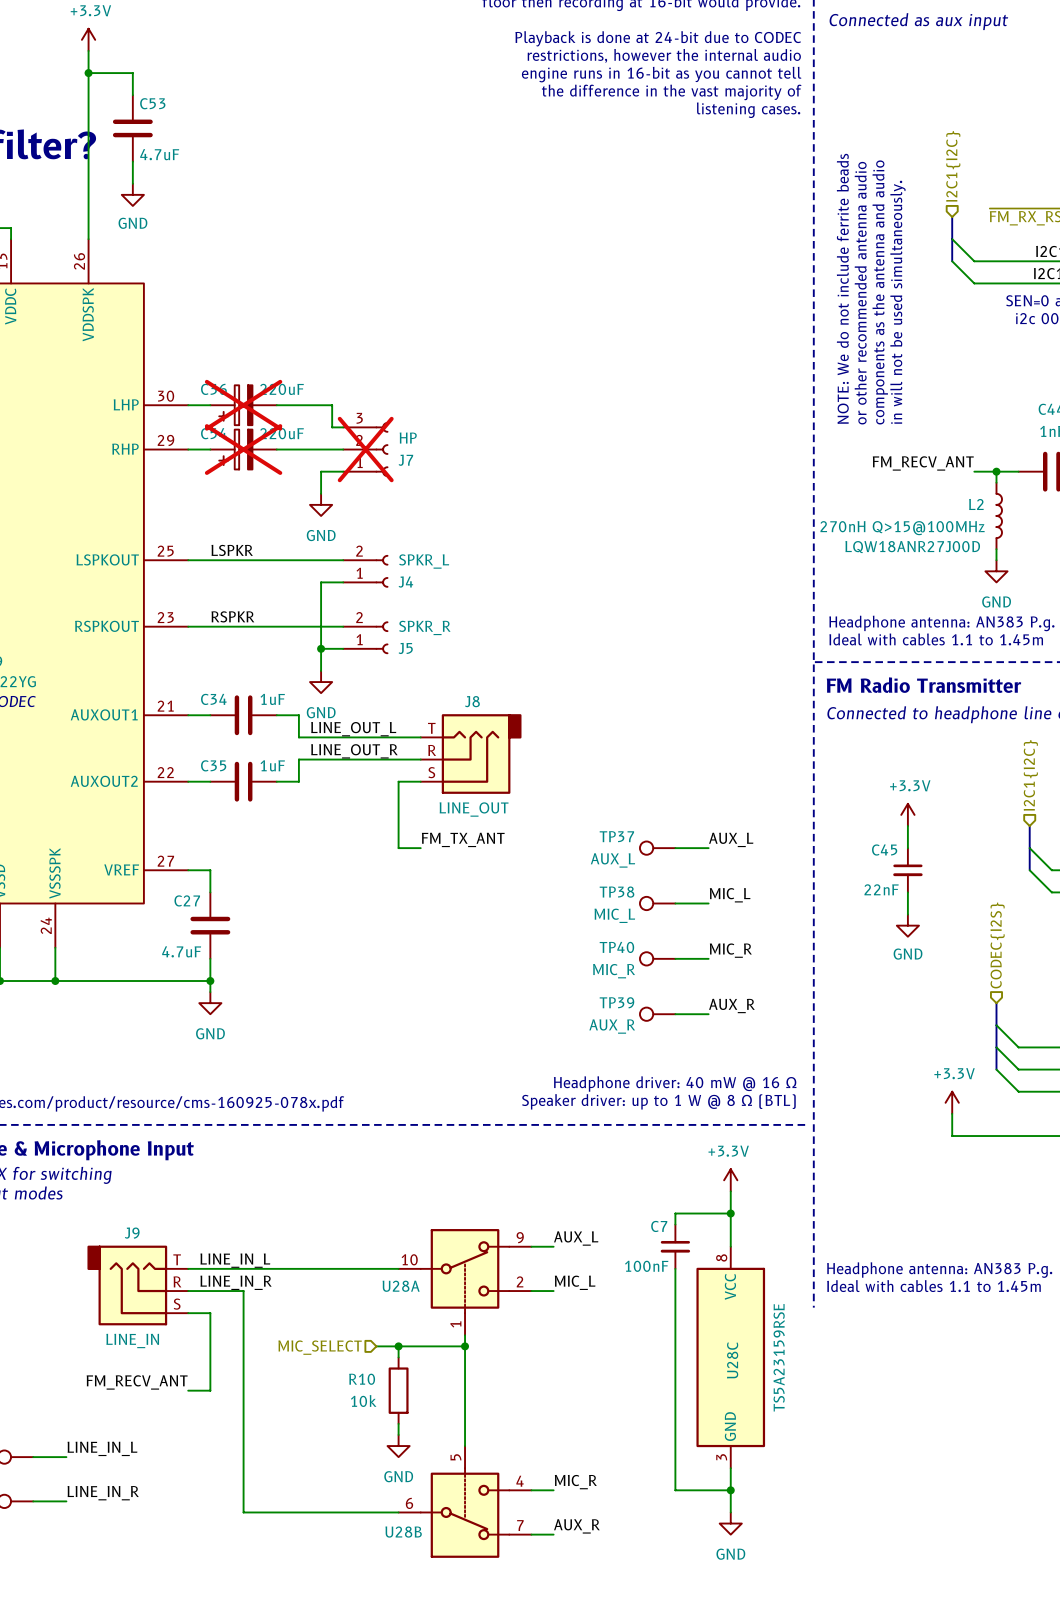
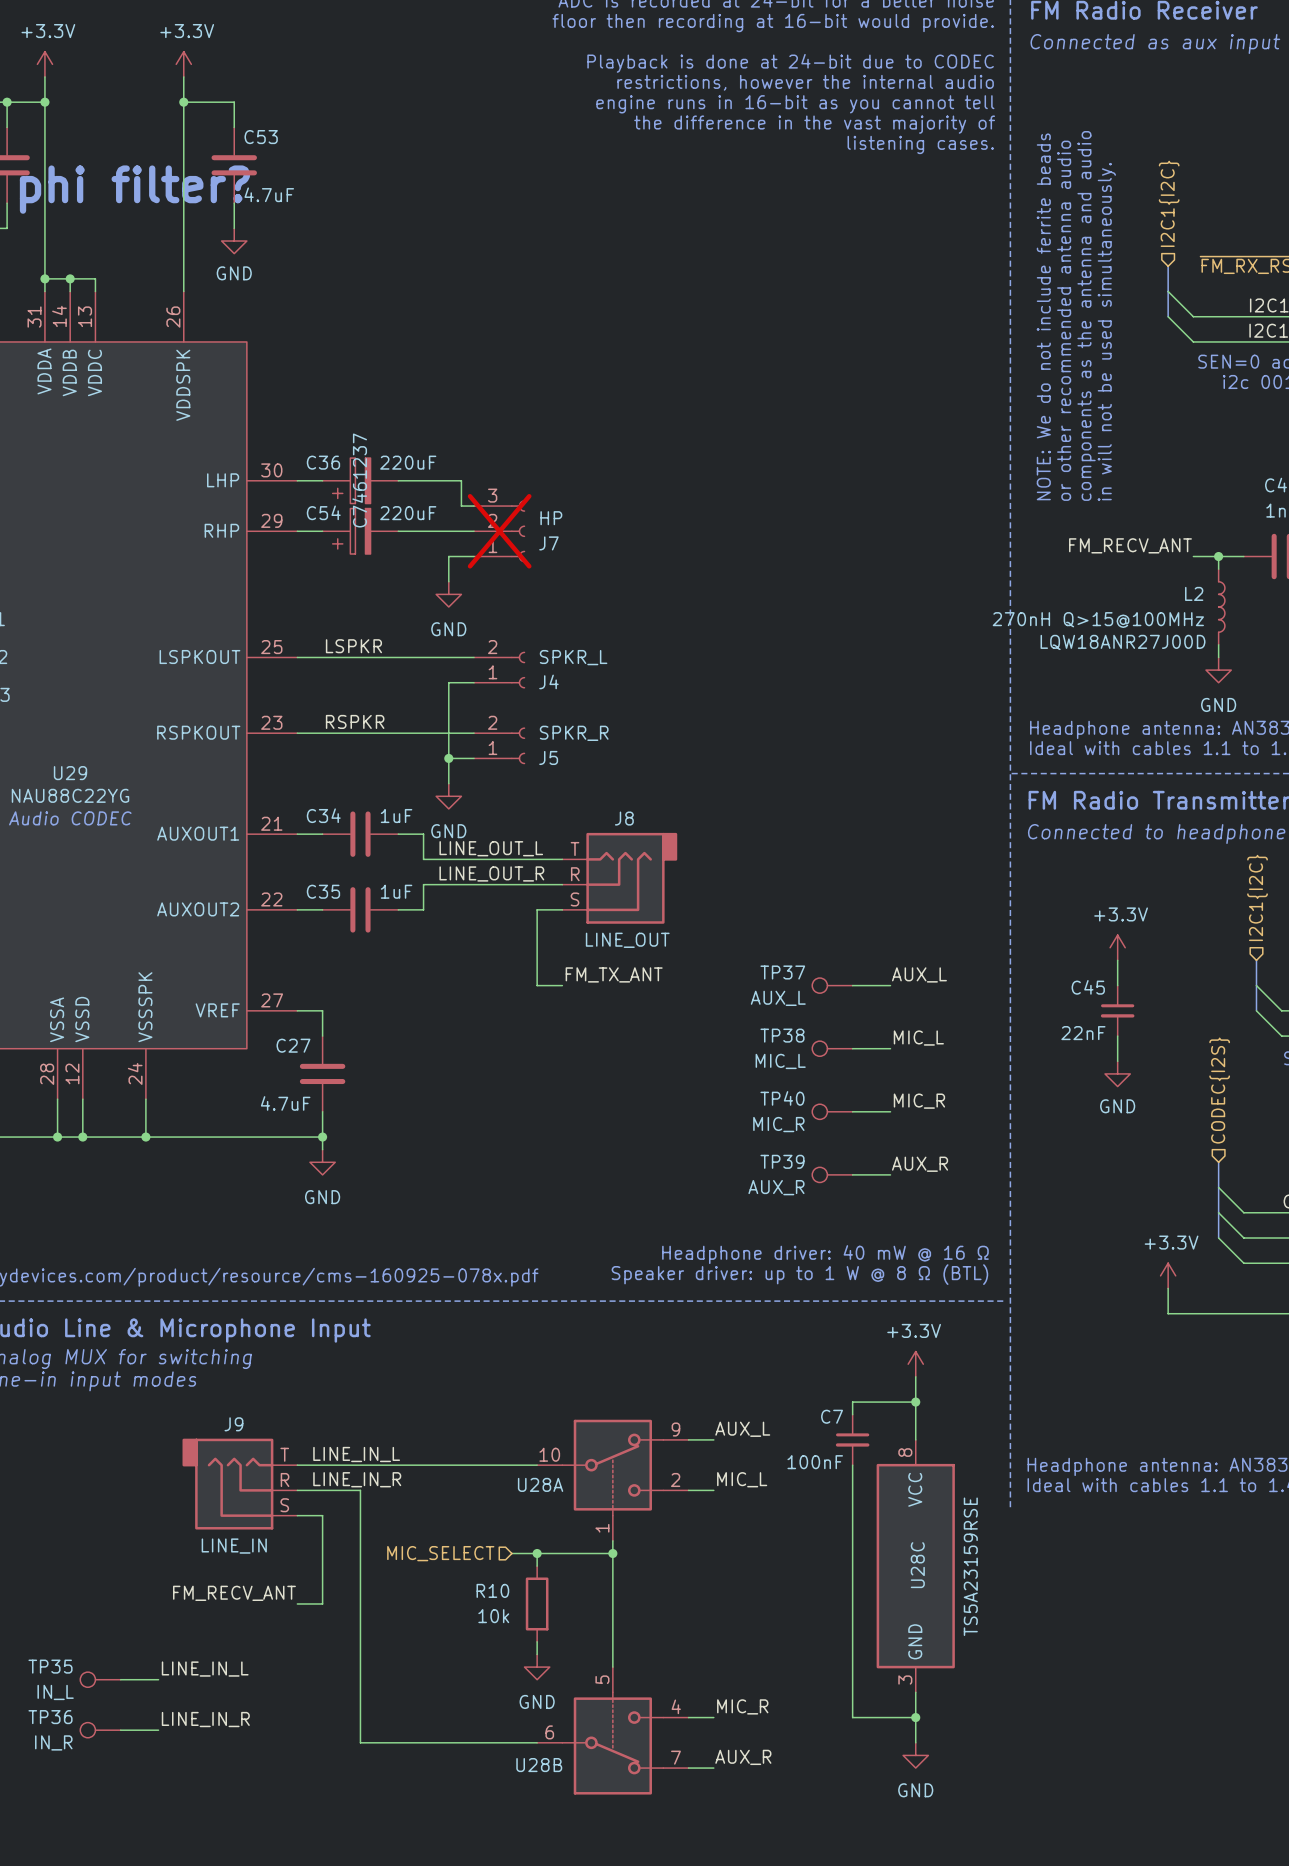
C36 do-not-place cross: (243, 405) -> none
C36 text: none -> C7461237 (359, 480)
C54 do-not-place cross: (243, 449) -> none

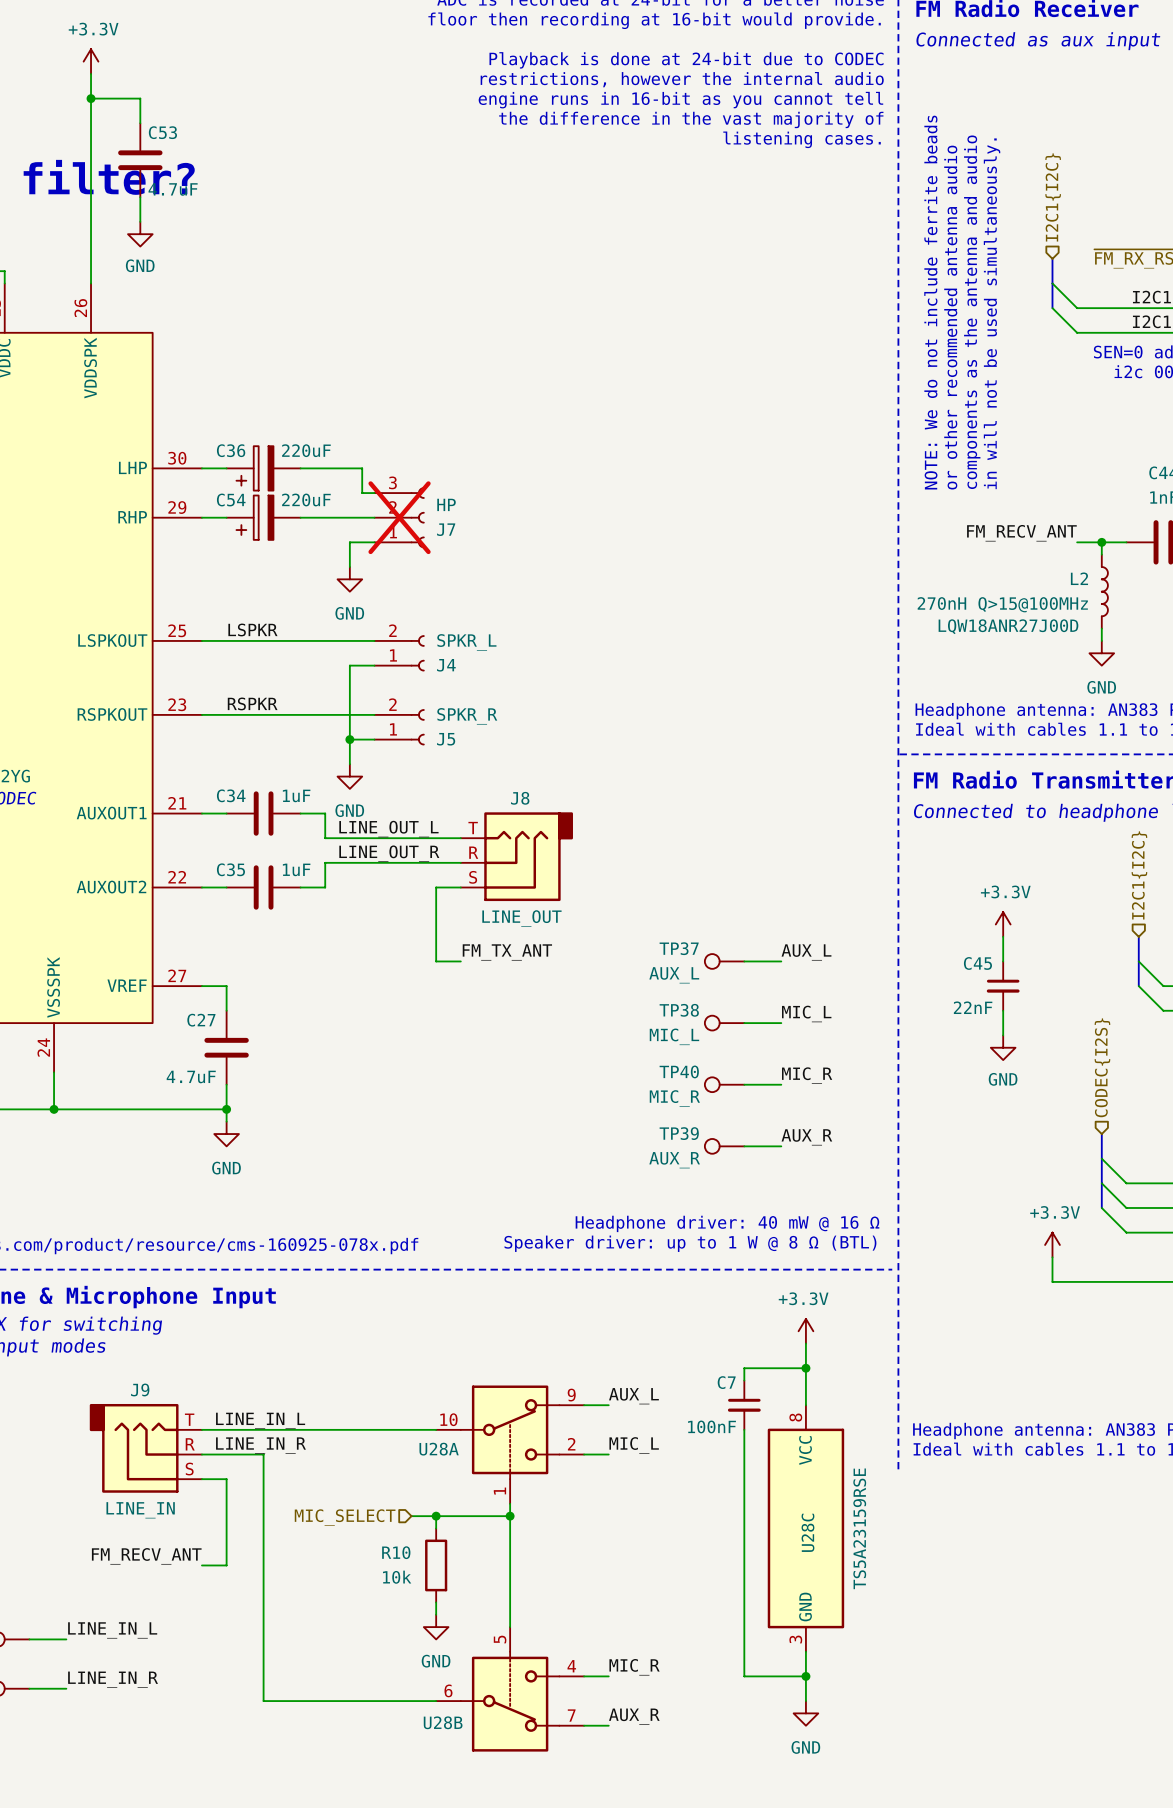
C36 text: C7461237 (359, 480) -> none

